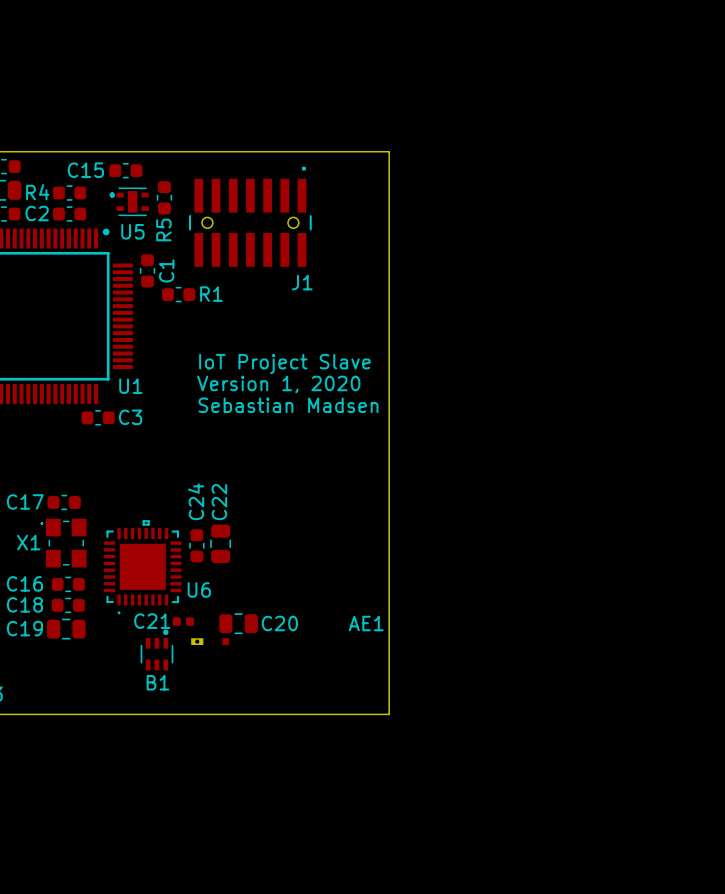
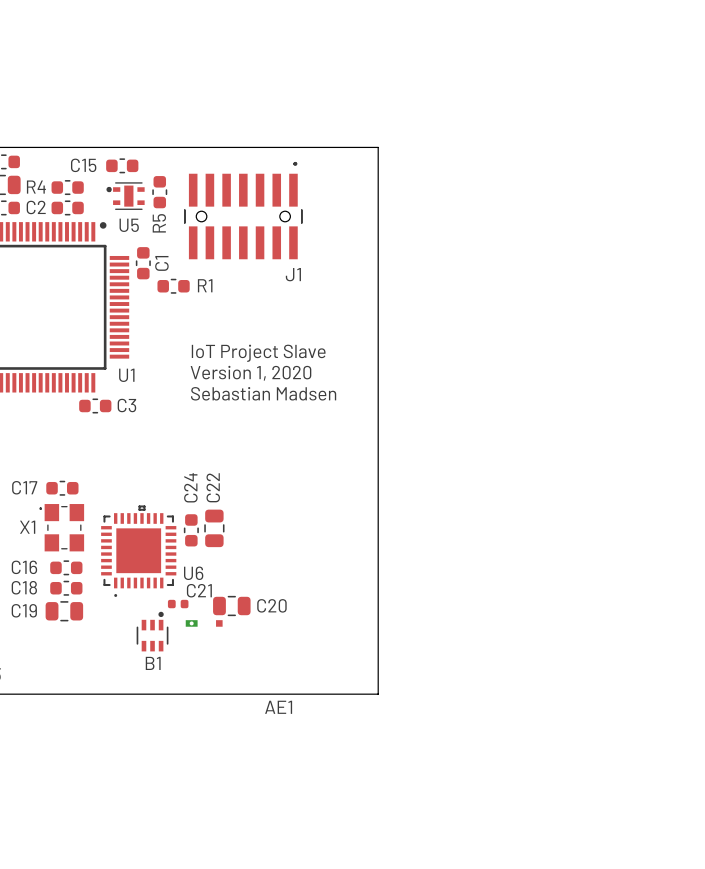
C21 name position: C21 (152, 621) -> C21 (199, 590)
AE1 name position: AE1 (366, 623) -> AE1 (278, 707)

